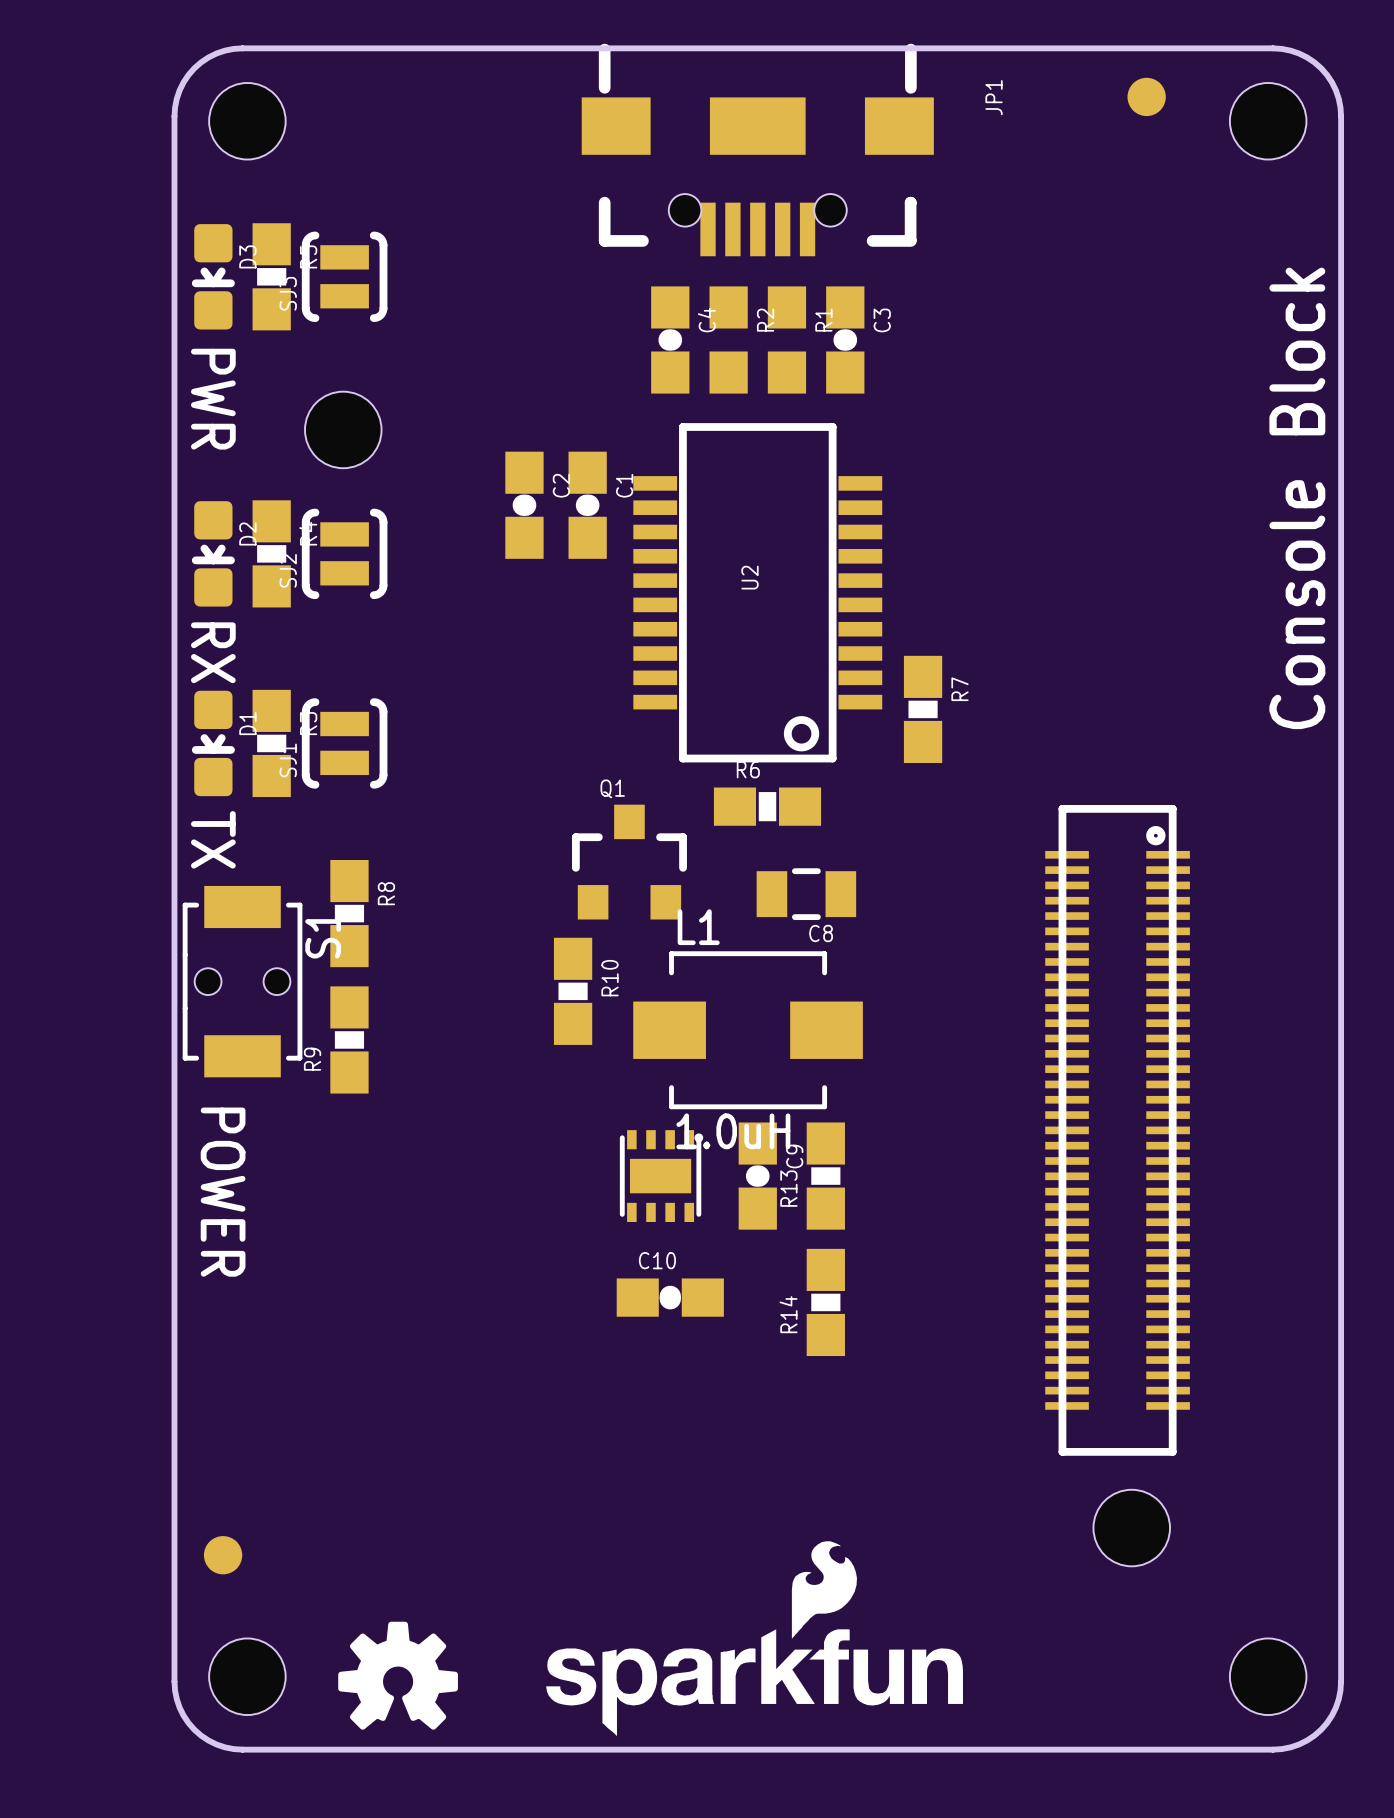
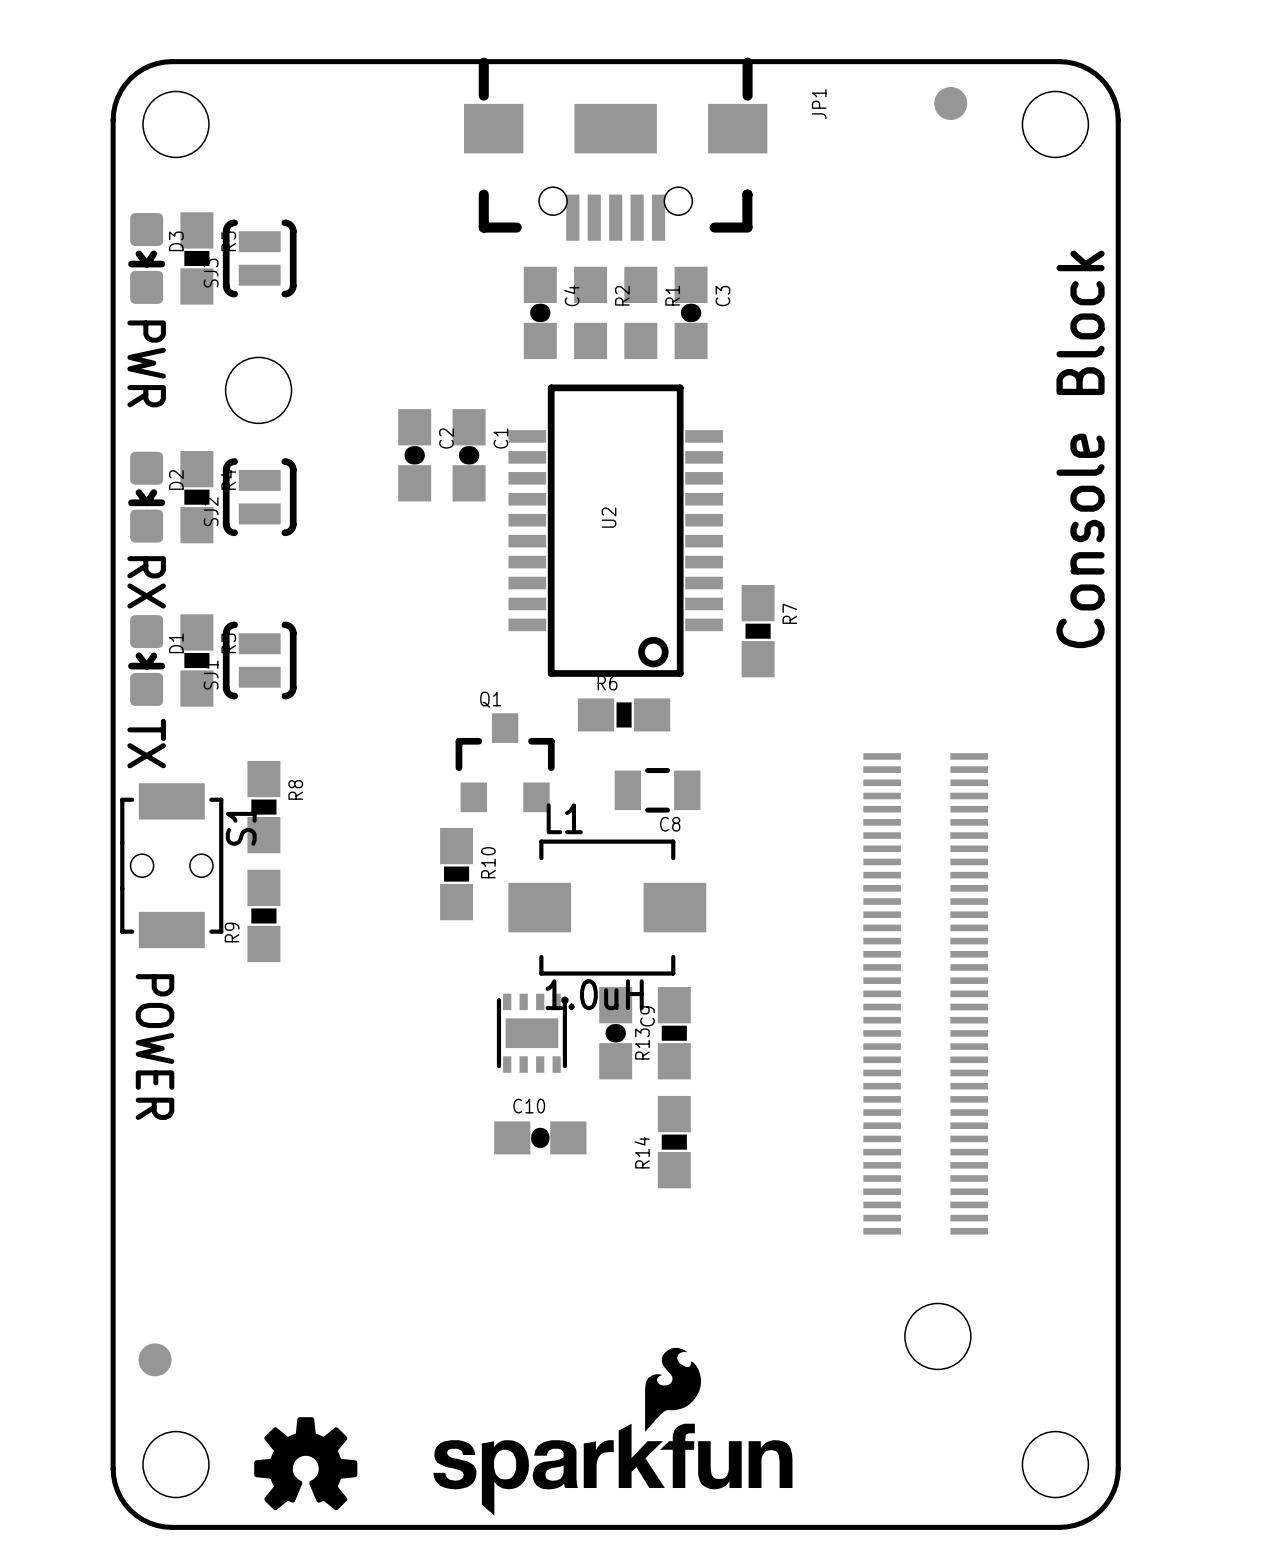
part footprint: [1045, 804, 1190, 1456] -> [863, 753, 988, 1235]

